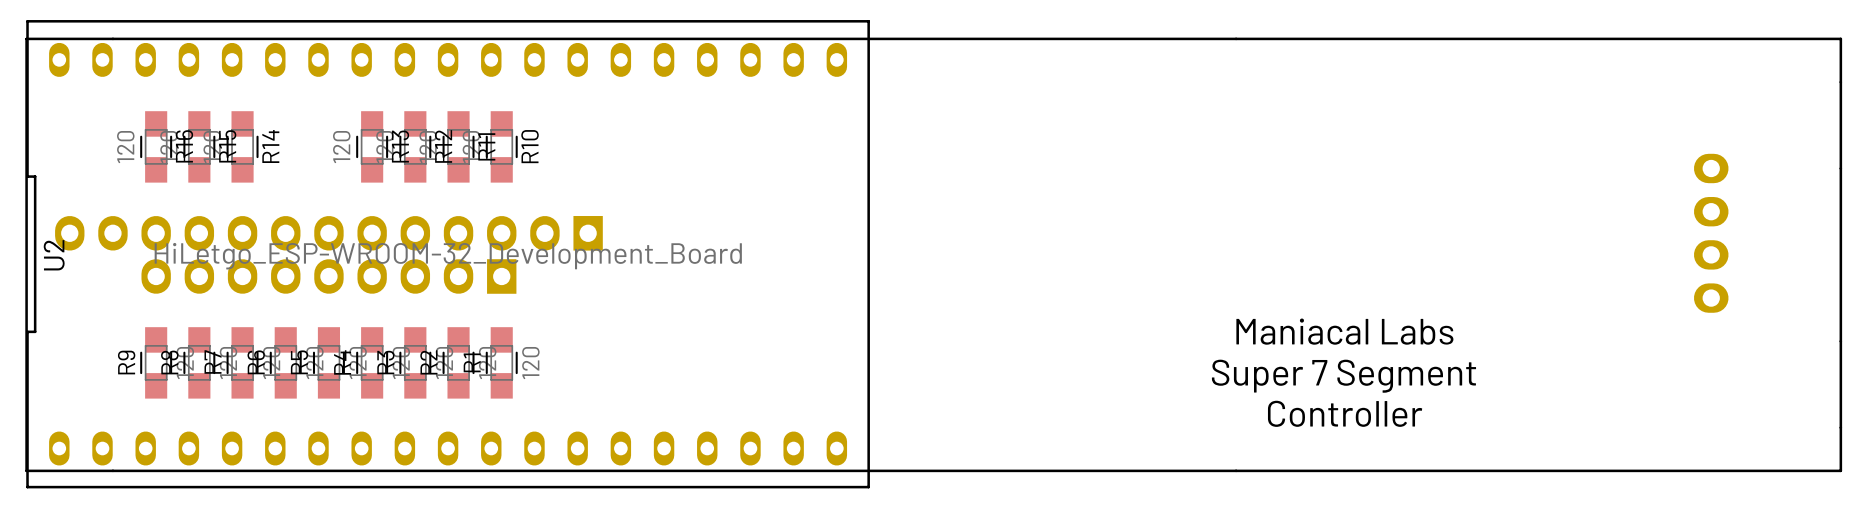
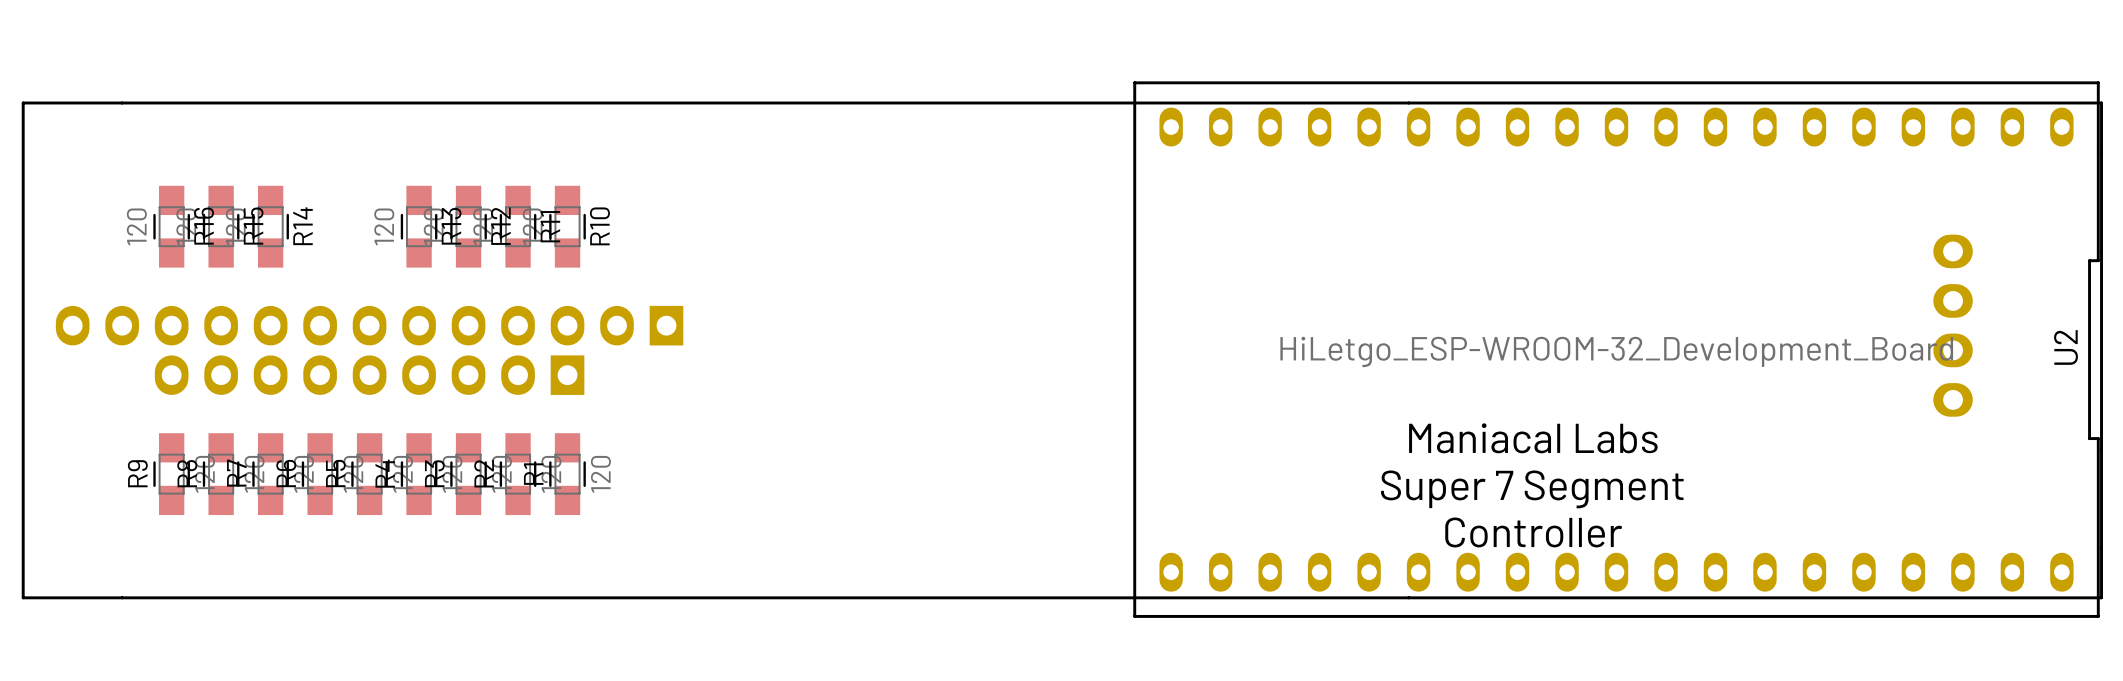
U2 rotation: 0° (448, 254) -> 180° (1616, 349)
U2 position: (448, 254) -> (1616, 349)

